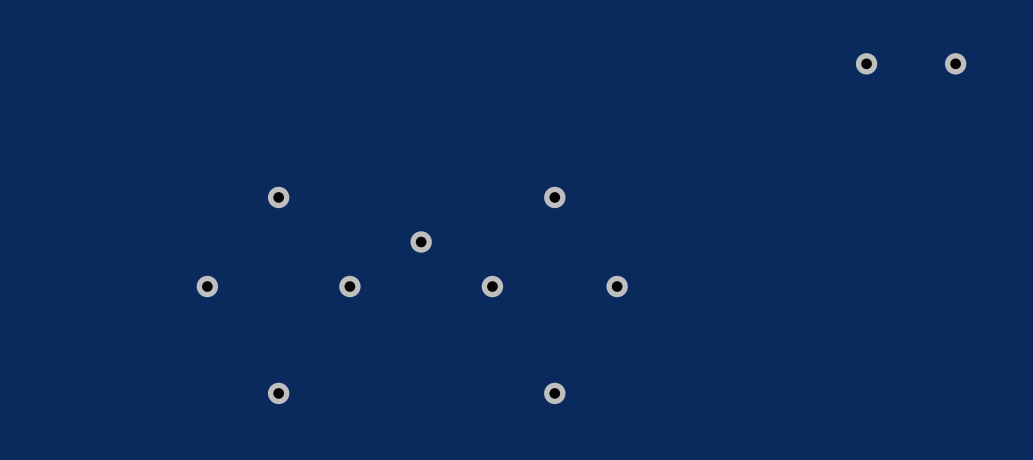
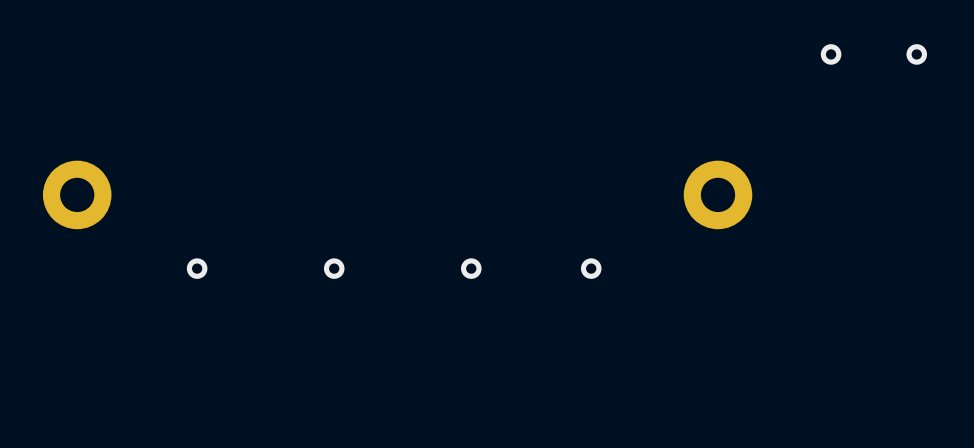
via: (278, 197) -> none
via: (554, 197) -> none
part: none -> (77, 194)
part: none -> (718, 194)
via: (421, 241) -> none
via: (278, 393) -> none
via: (554, 393) -> none

